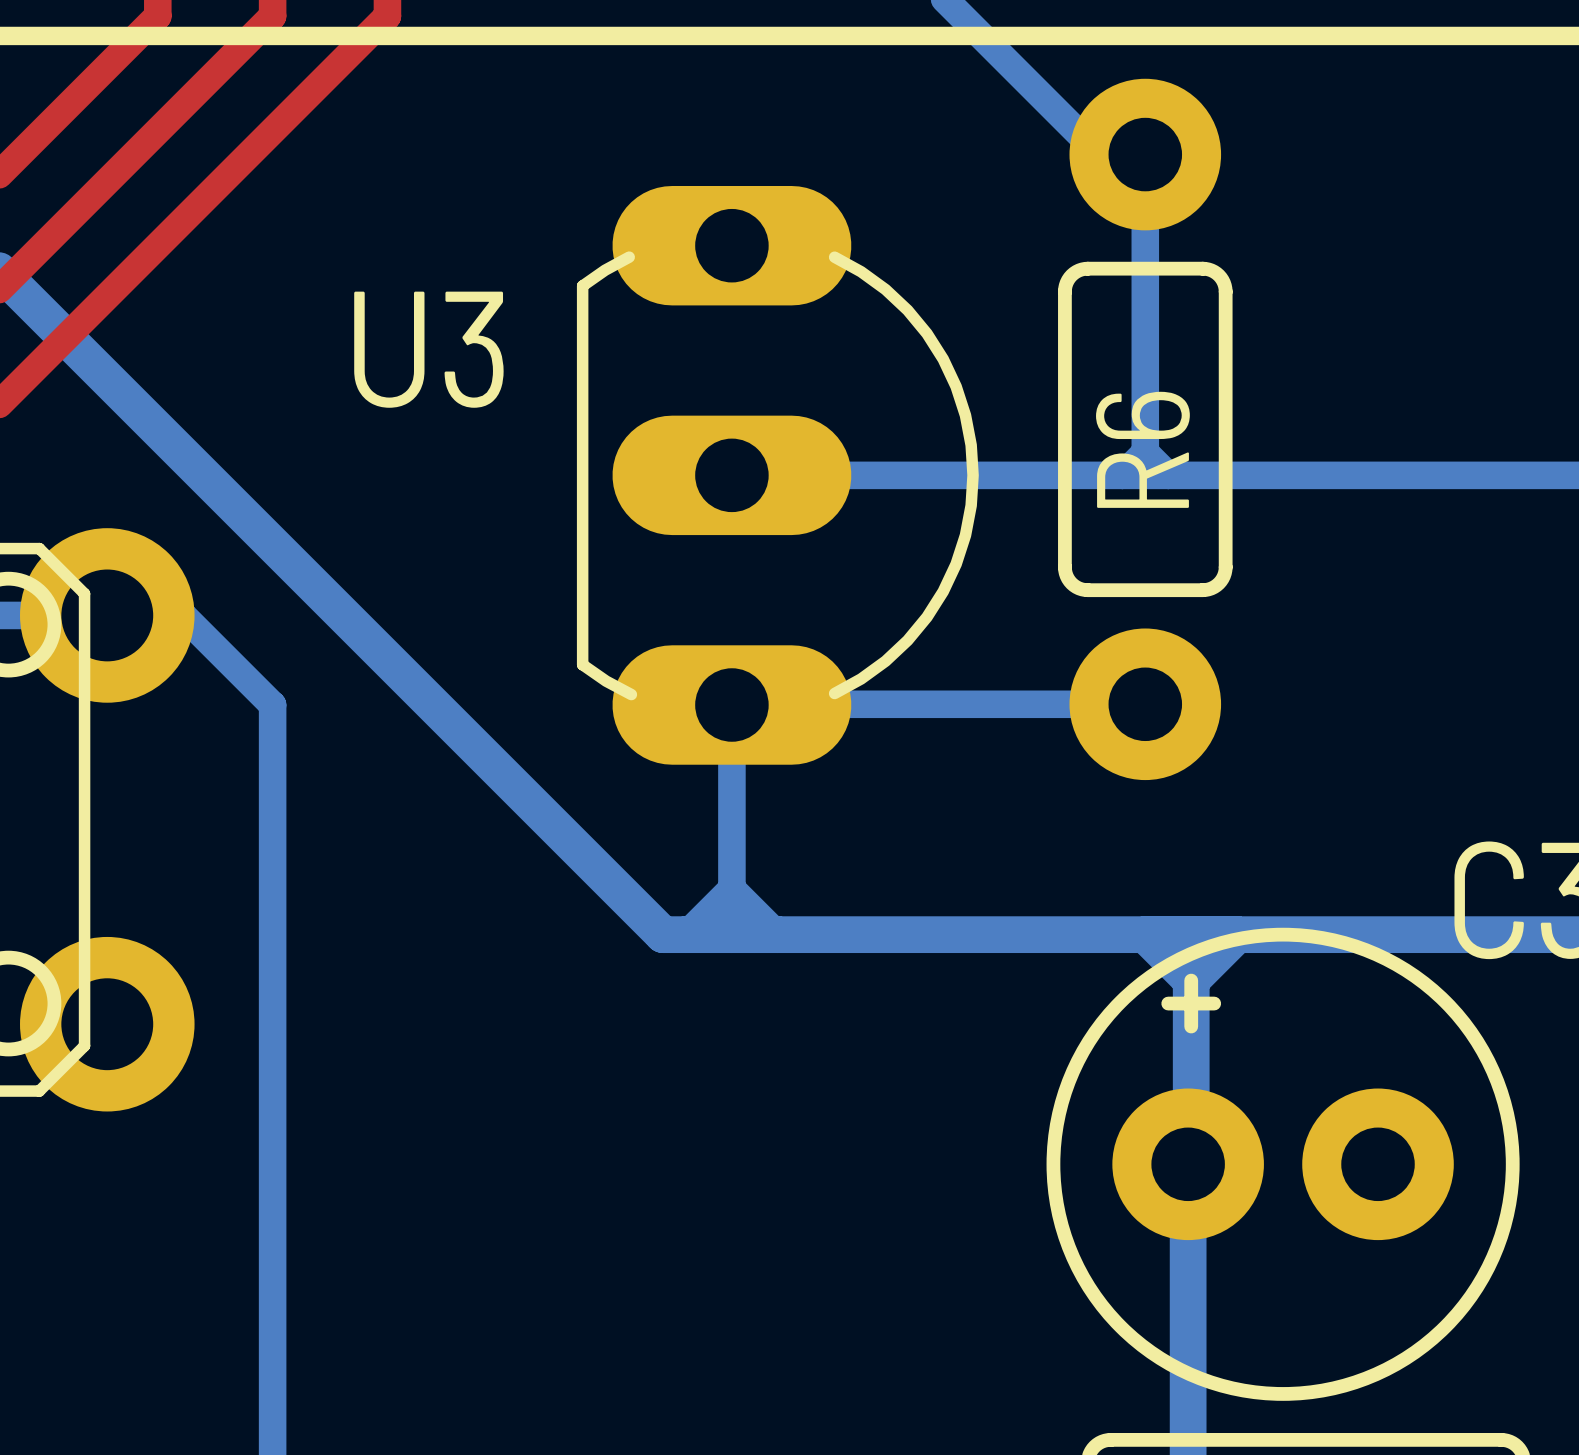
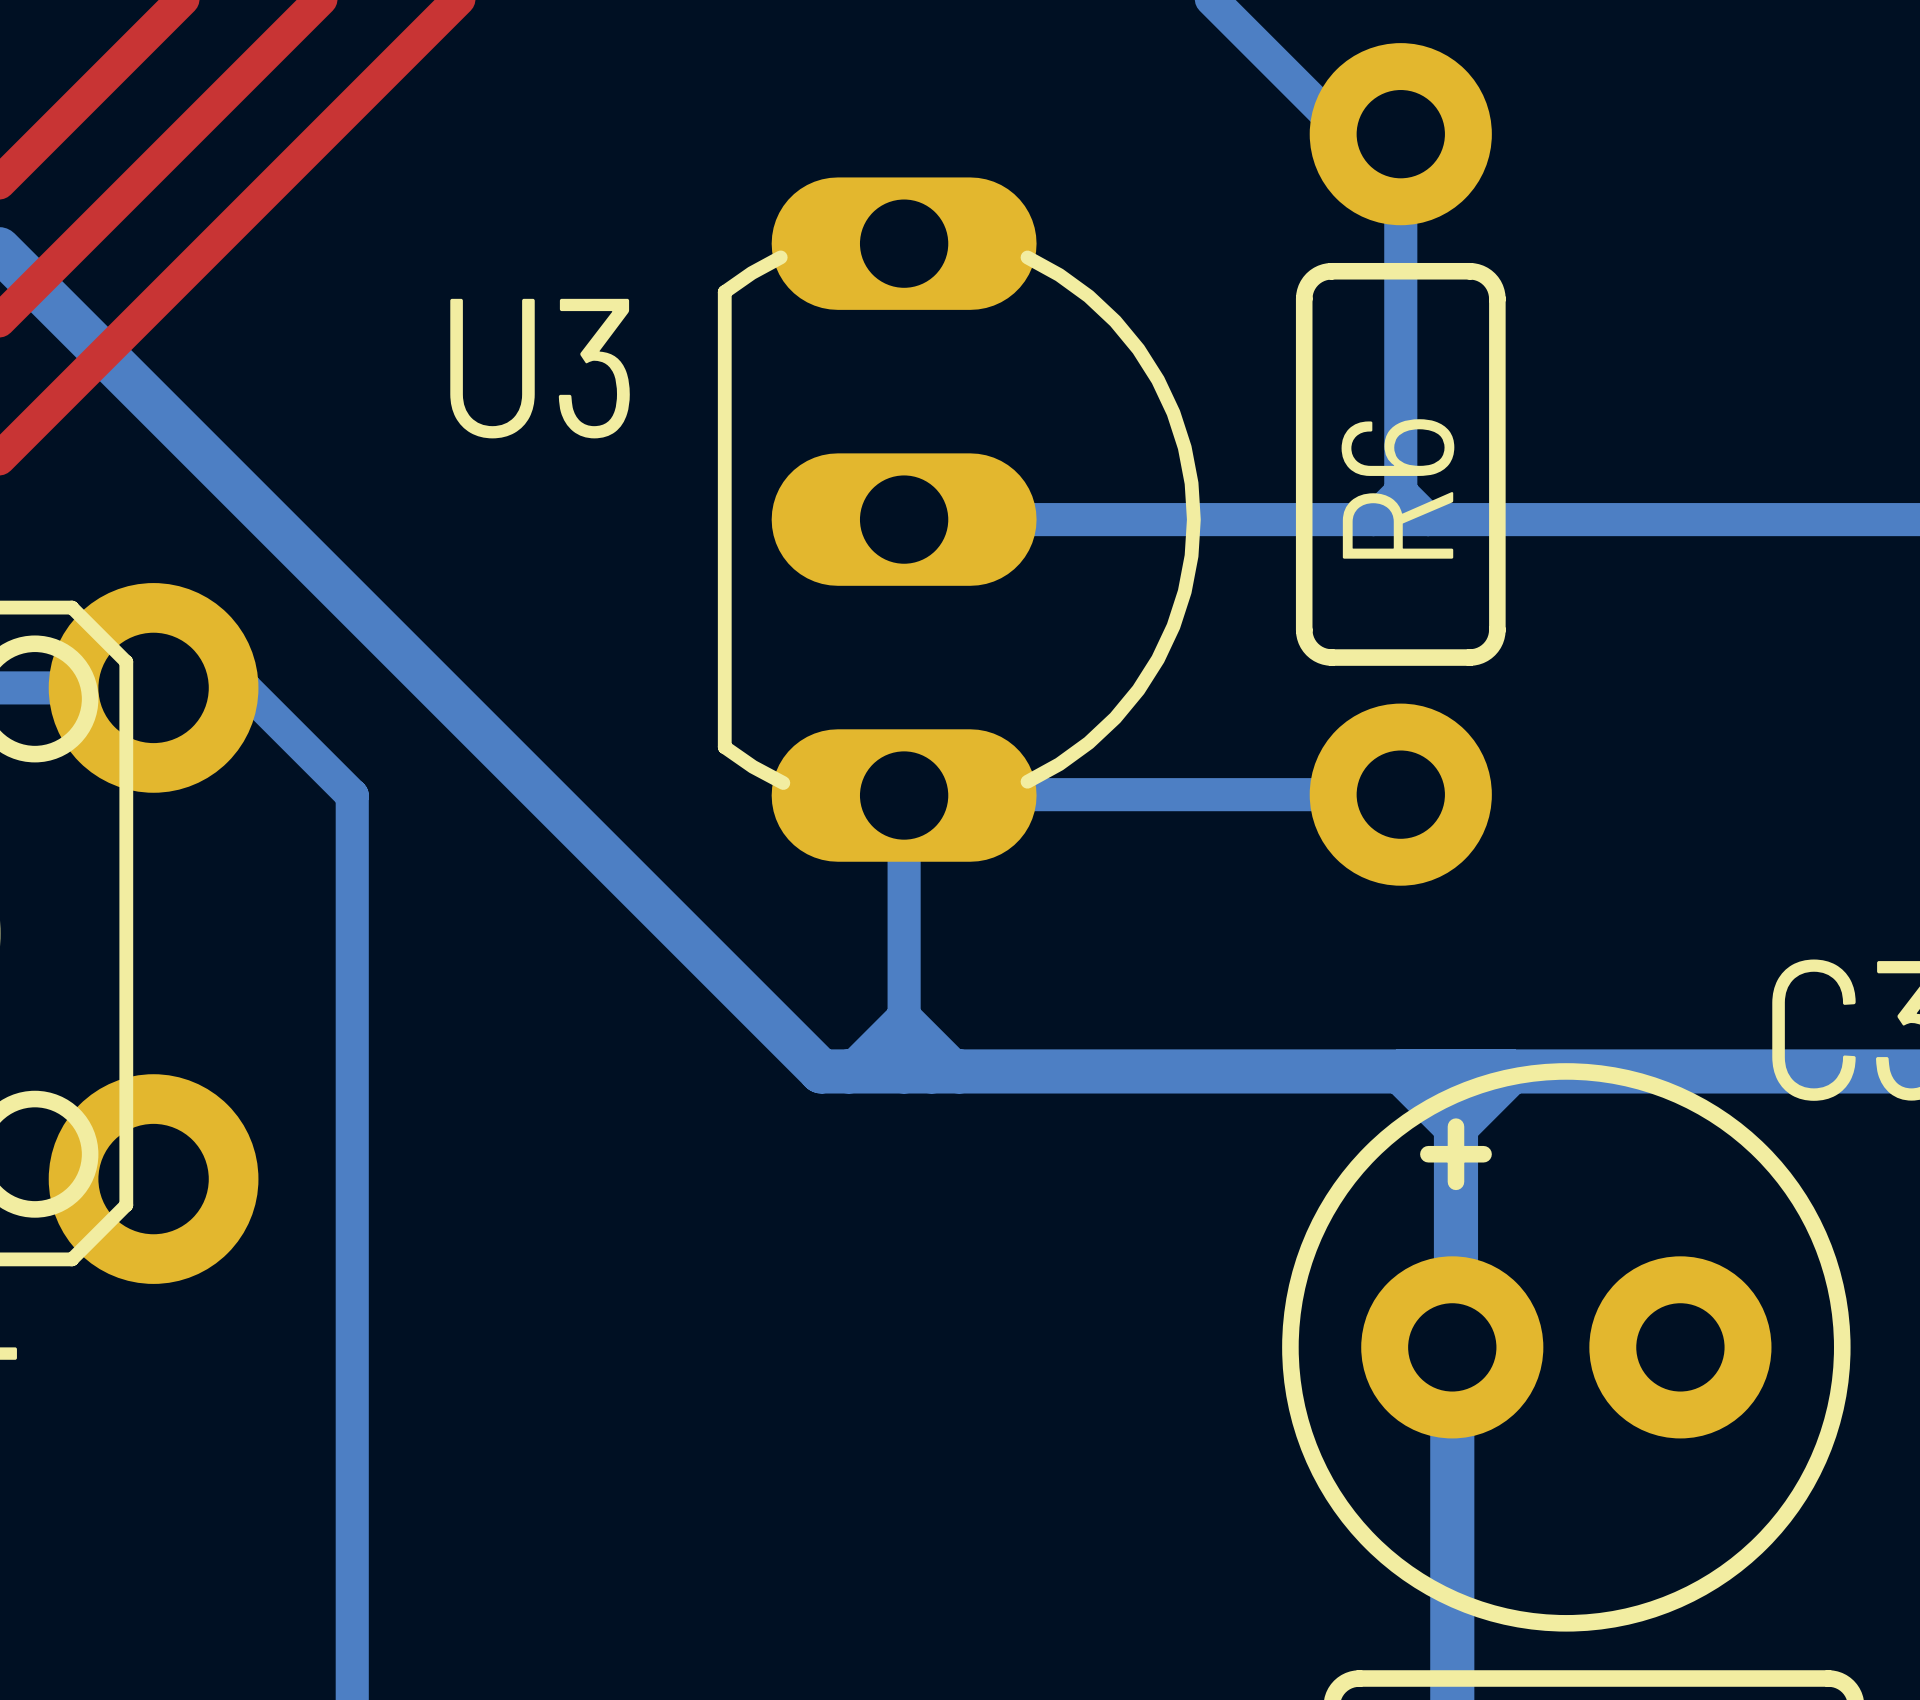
U3 footprint: [576, 186, 979, 765] -> [717, 177, 1201, 862]

